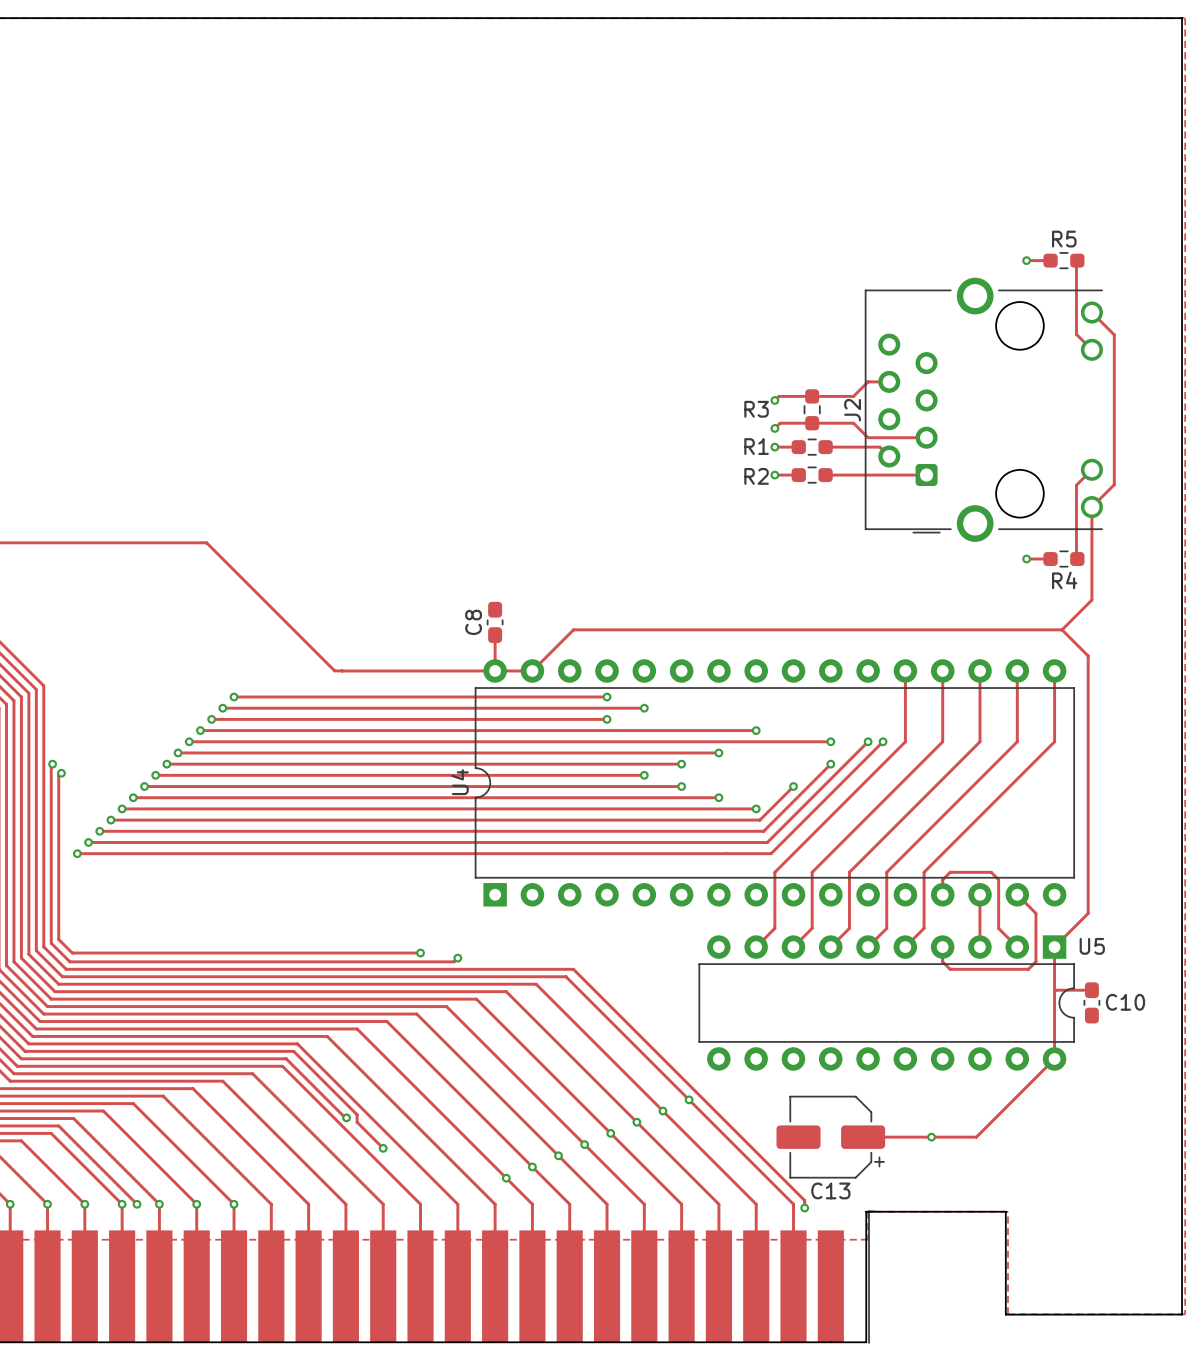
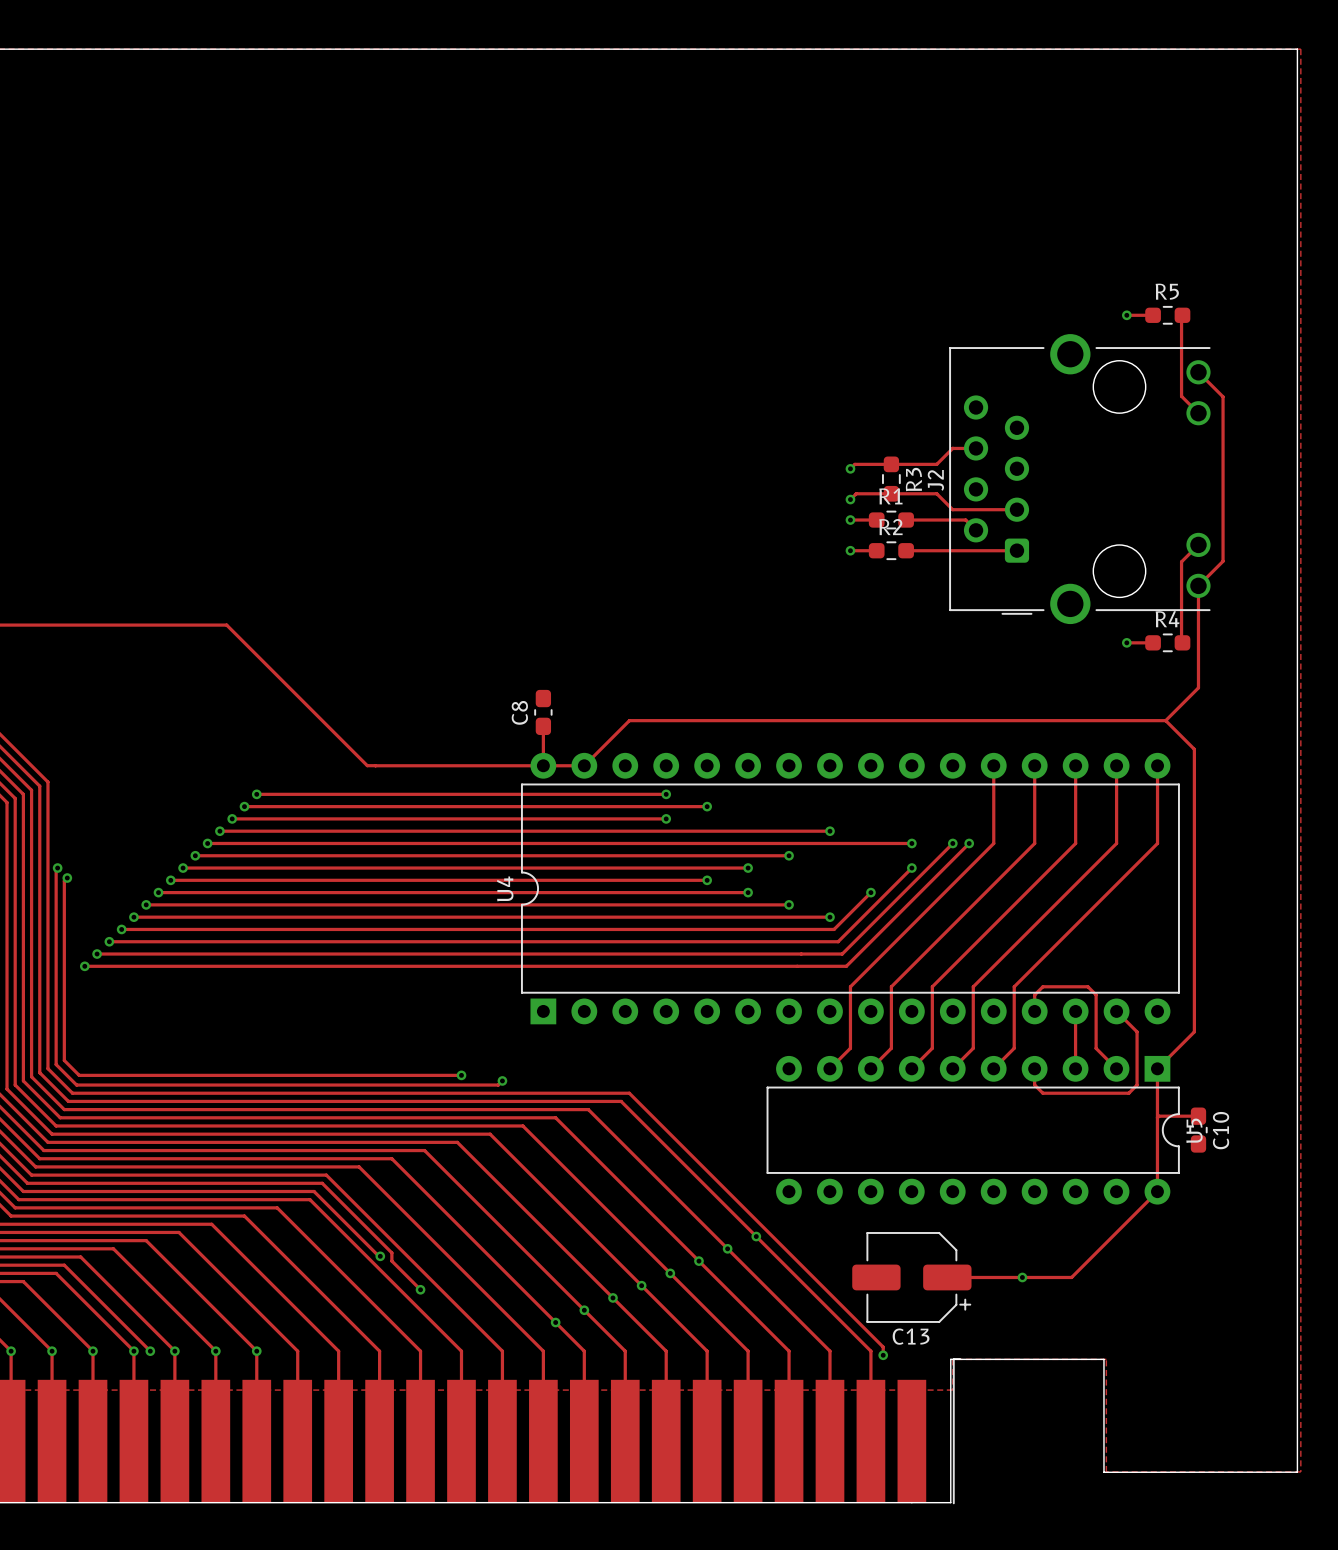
R3 name rotation: 0° (756, 409) -> 90° counterclockwise (913, 479)
R3 name position: R3 (756, 409) -> R3 (913, 479)
R1 name position: R1 (756, 446) -> R1 (890, 496)
R2 name position: R2 (756, 476) -> R2 (890, 527)
R4 name position: R4 (1064, 580) -> R4 (1167, 619)
U5 name rotation: 0° (1092, 946) -> 90° counterclockwise (1194, 1130)
U5 name position: U5 (1092, 946) -> U5 (1194, 1130)
C10 name rotation: 0° (1125, 1002) -> 90° counterclockwise (1221, 1130)

